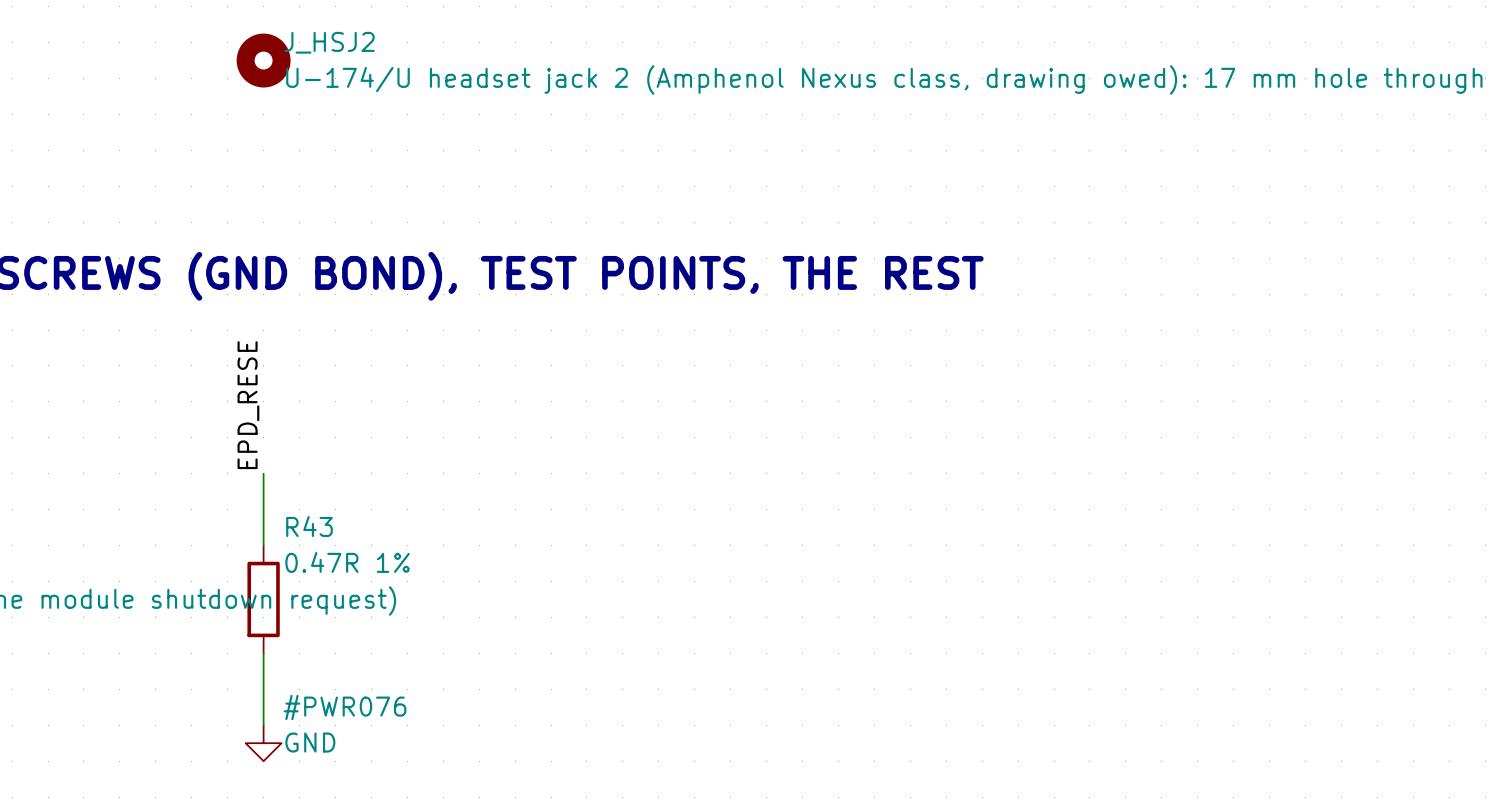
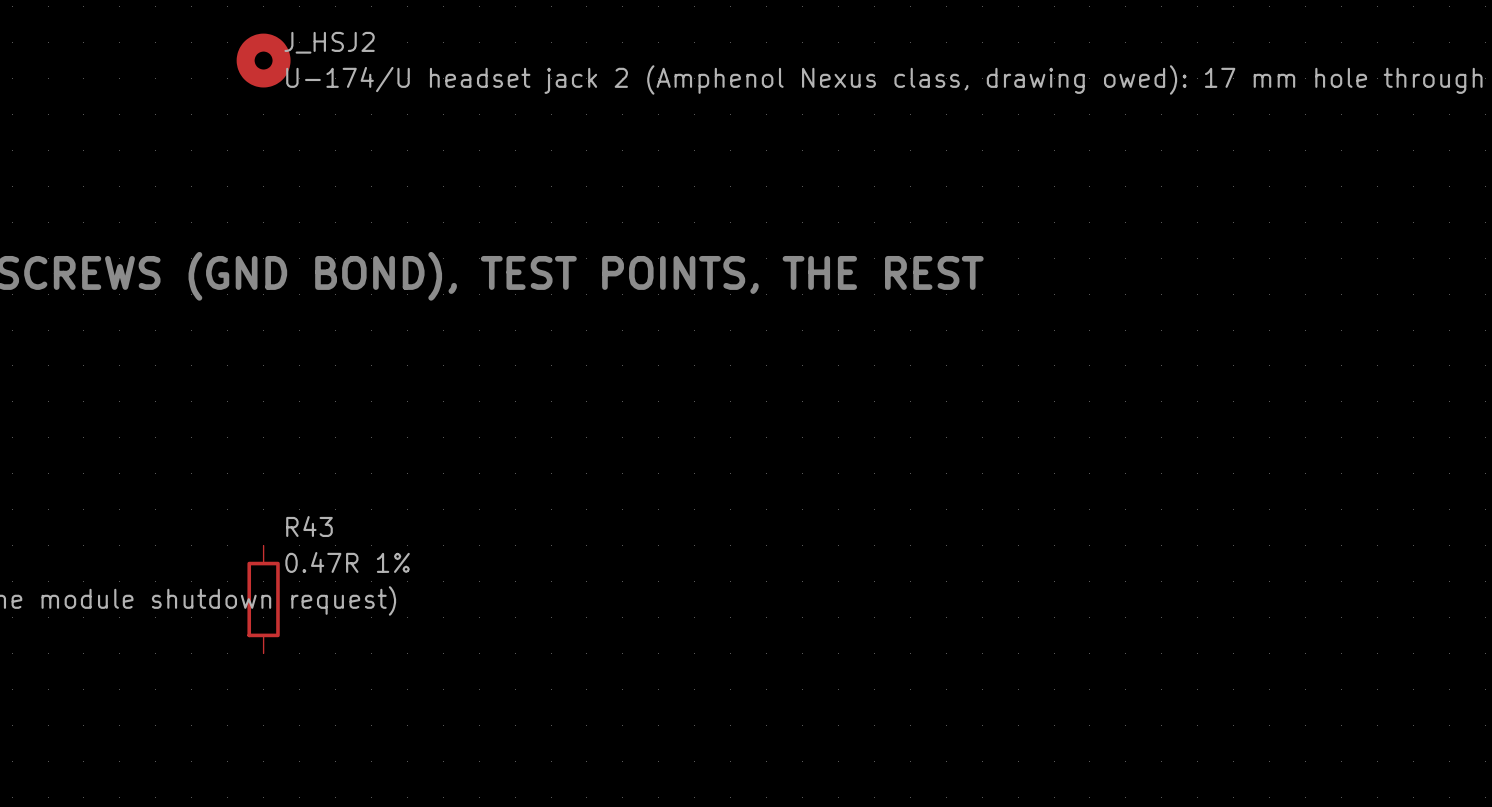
label: EPD_RESE (248, 405) -> none
wire: (263, 473) (263, 545) -> none
wire: (263, 653) (263, 725) -> none
#PWR076: GND (263, 743) -> none

